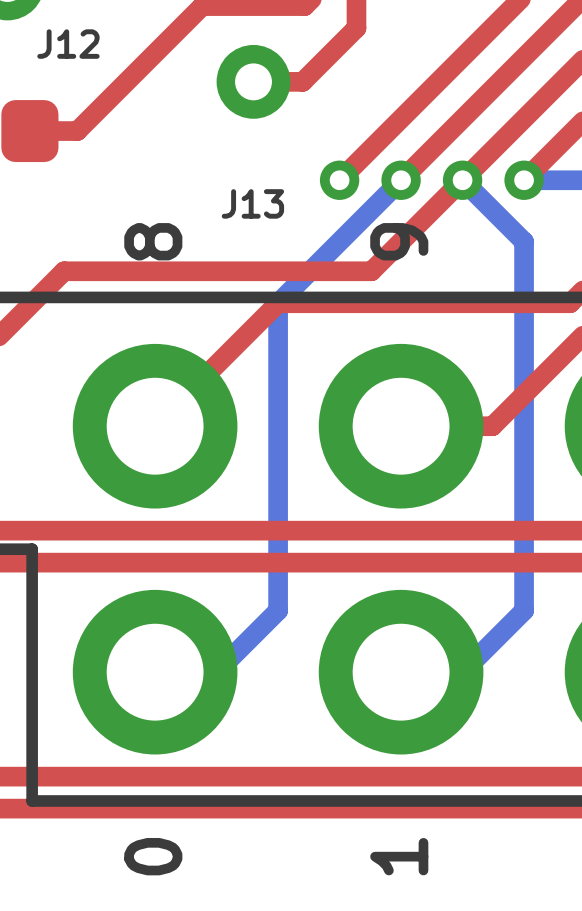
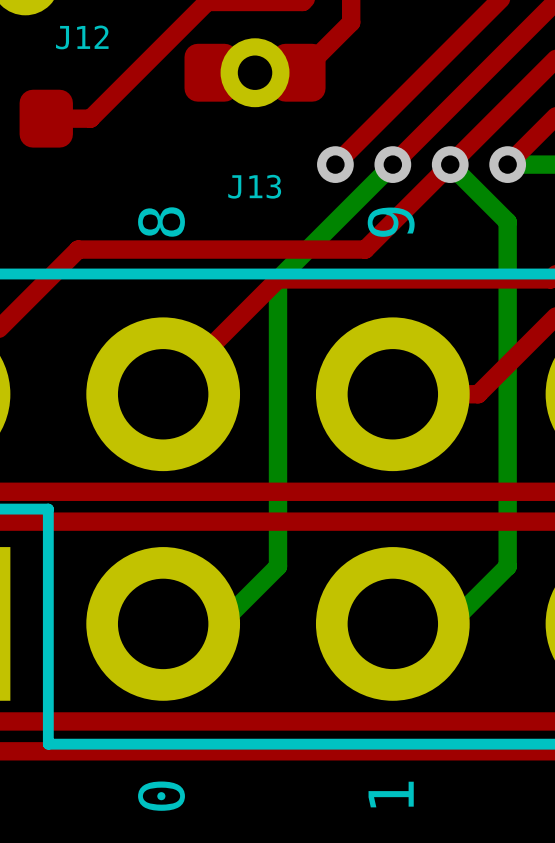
J13 footprint: [216, 44, 291, 119] -> [184, 38, 326, 108]

